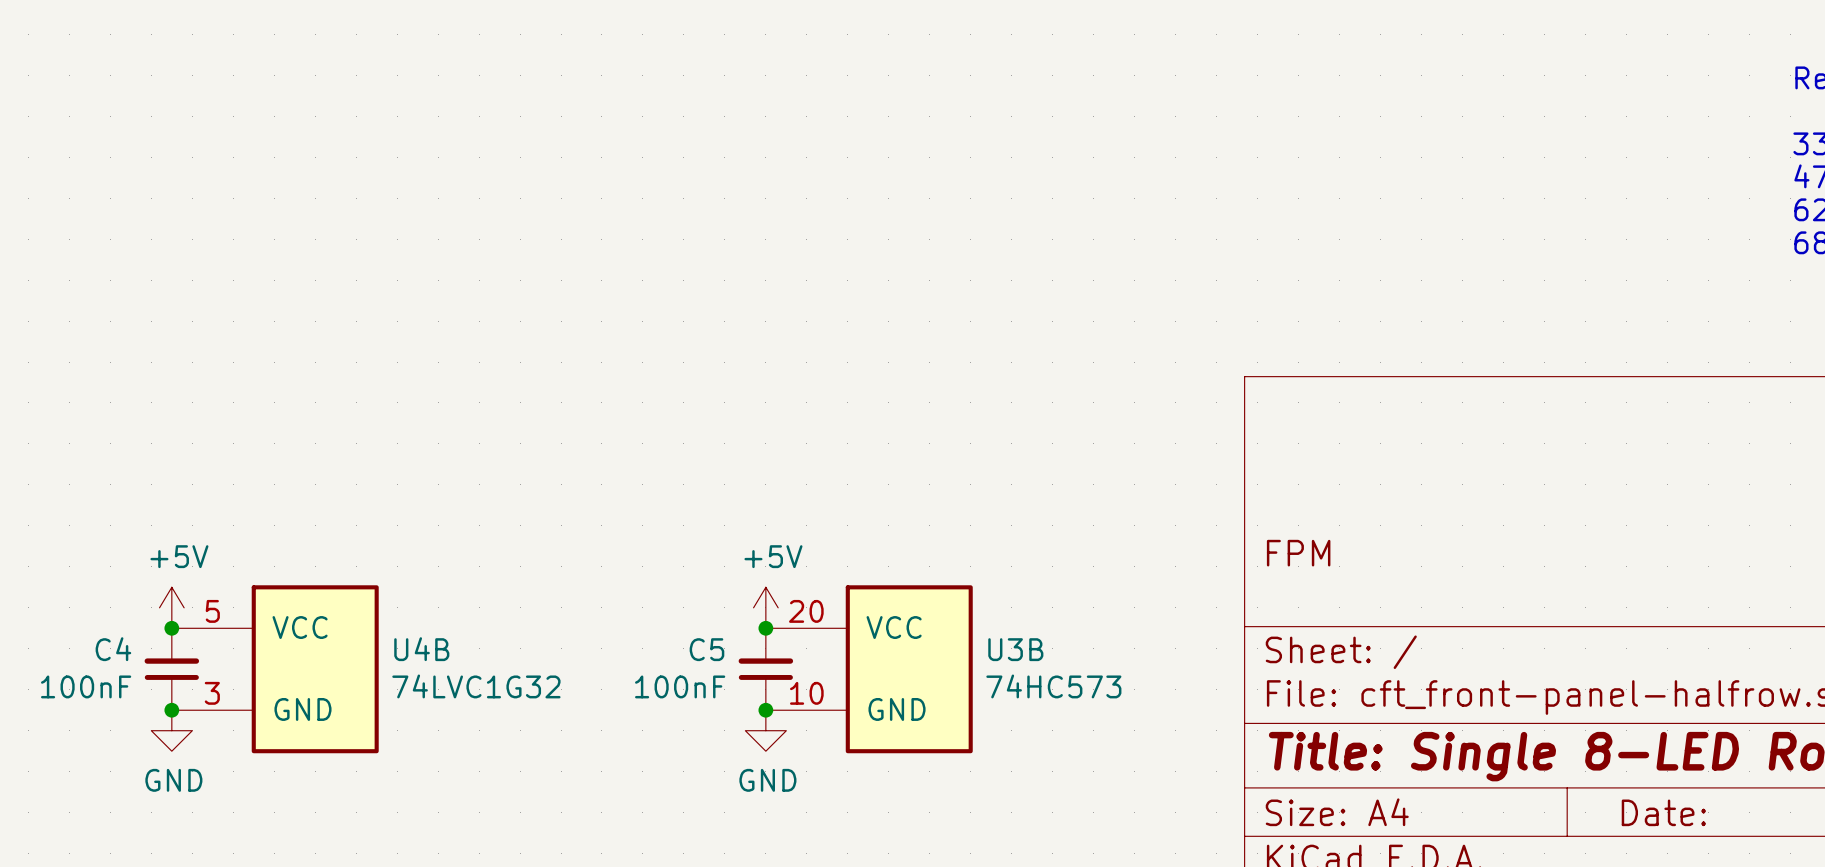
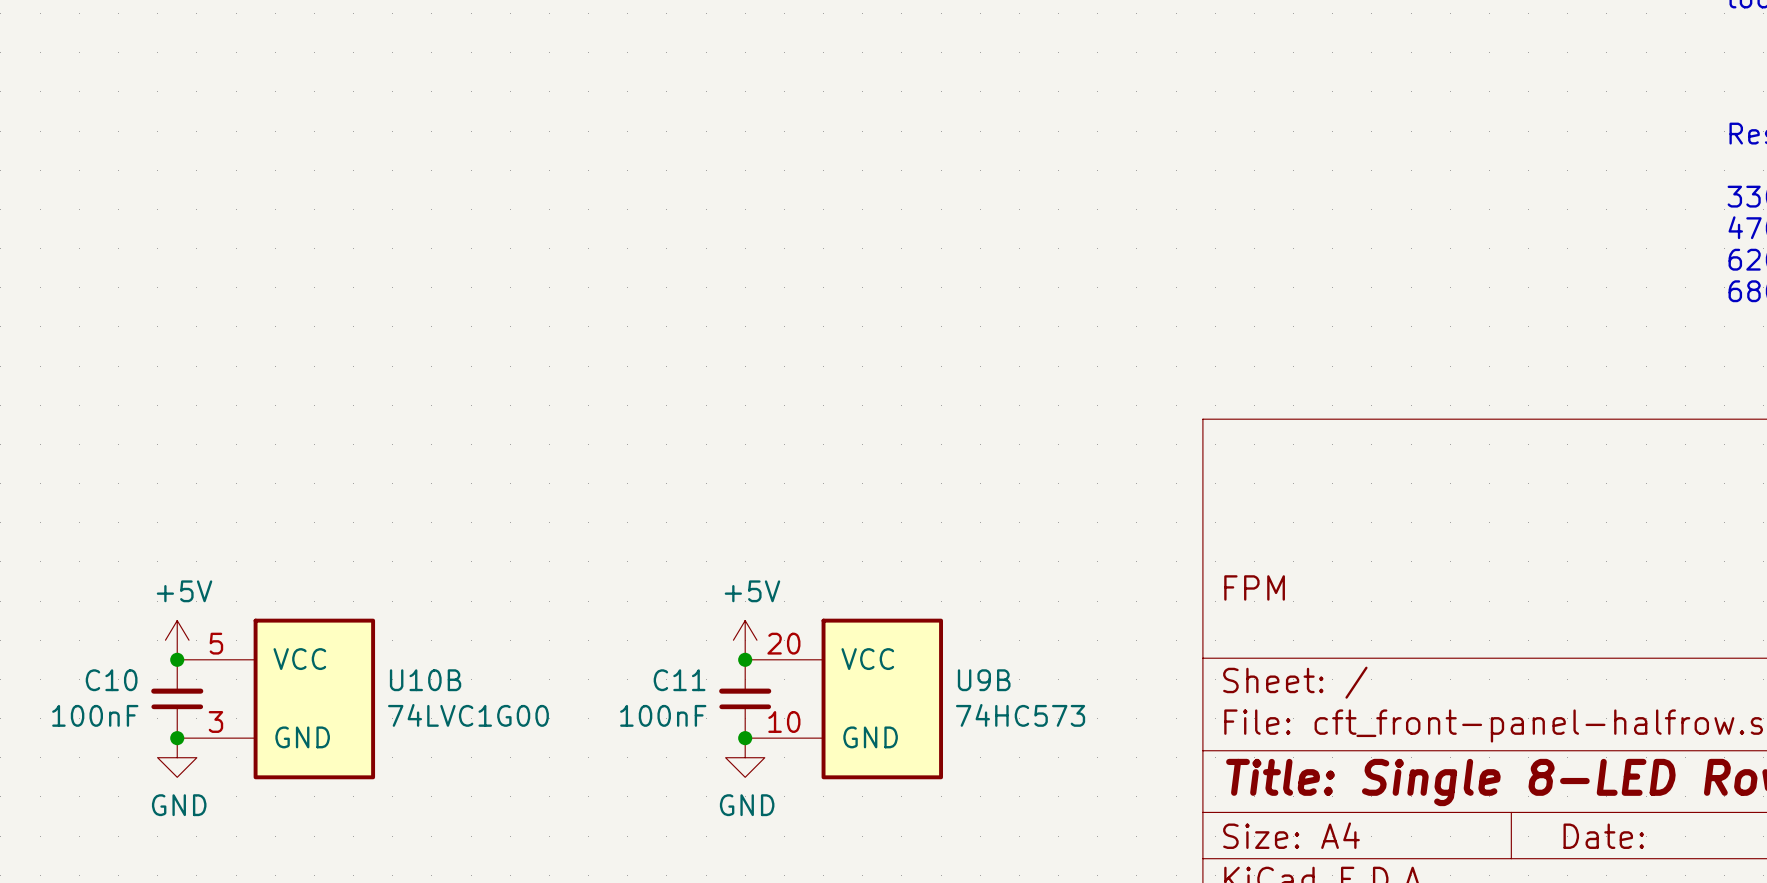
C4 name: C4 (113, 649) -> C10 (111, 680)
U4B name: U4B (421, 649) -> U10B (425, 680)
C5 name: C5 (706, 649) -> C11 (679, 680)
U3B name: U3B (1015, 649) -> U9B (984, 680)
U4B value: 74LVC1G32 (476, 686) -> 74LVC1G00 (468, 715)

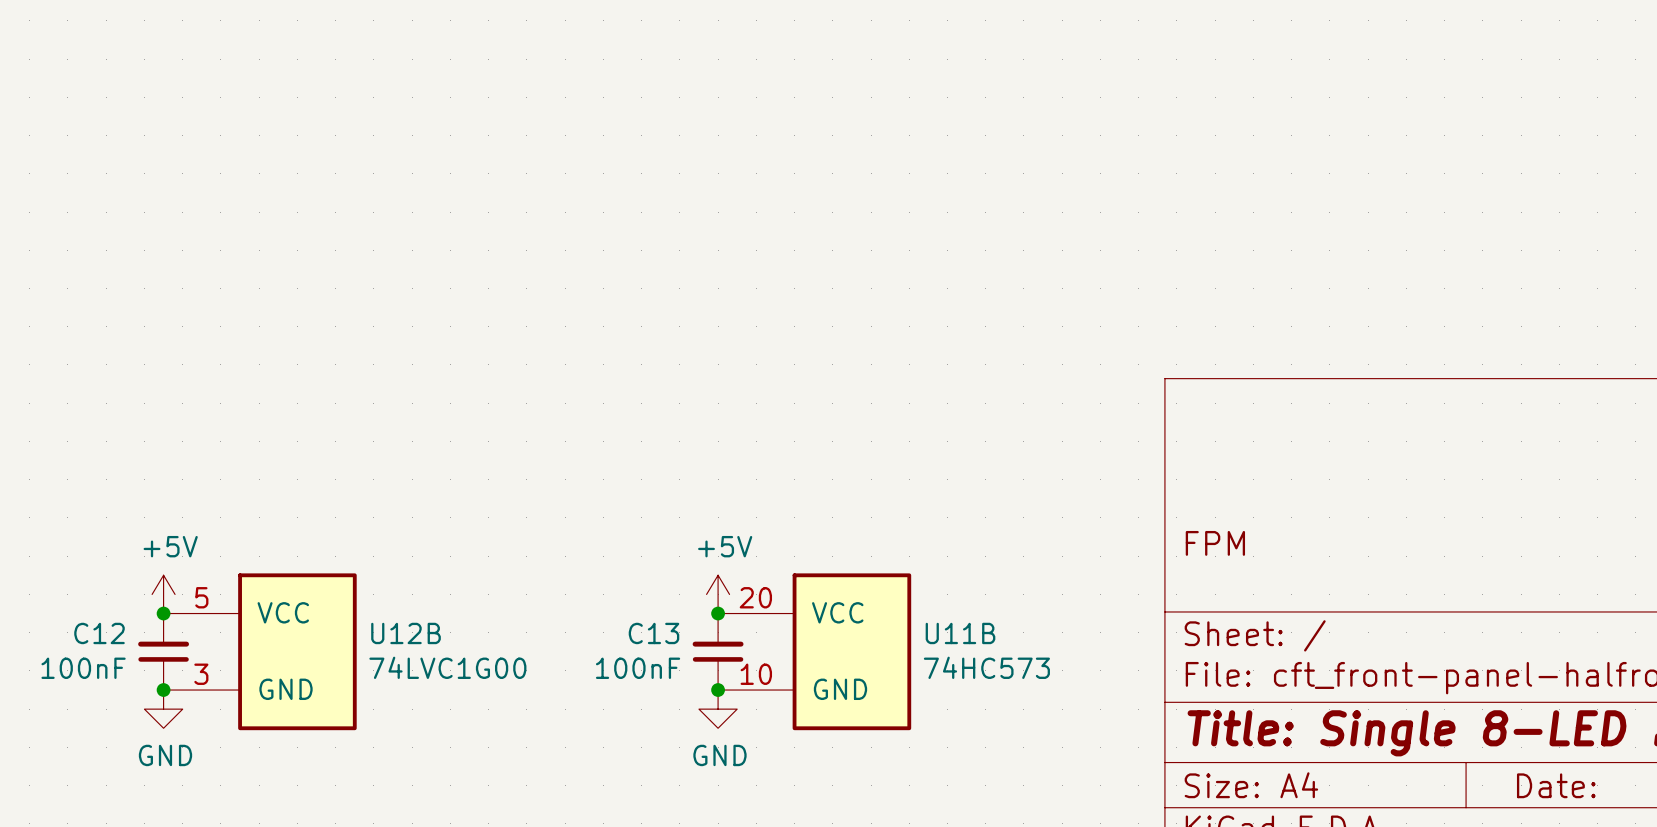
C10 name: C10 (111, 680) -> C12 (99, 633)
U10B name: U10B (425, 680) -> U12B (406, 633)
C11 name: C11 (679, 680) -> C13 (653, 633)
U9B name: U9B (984, 680) -> U11B (960, 633)

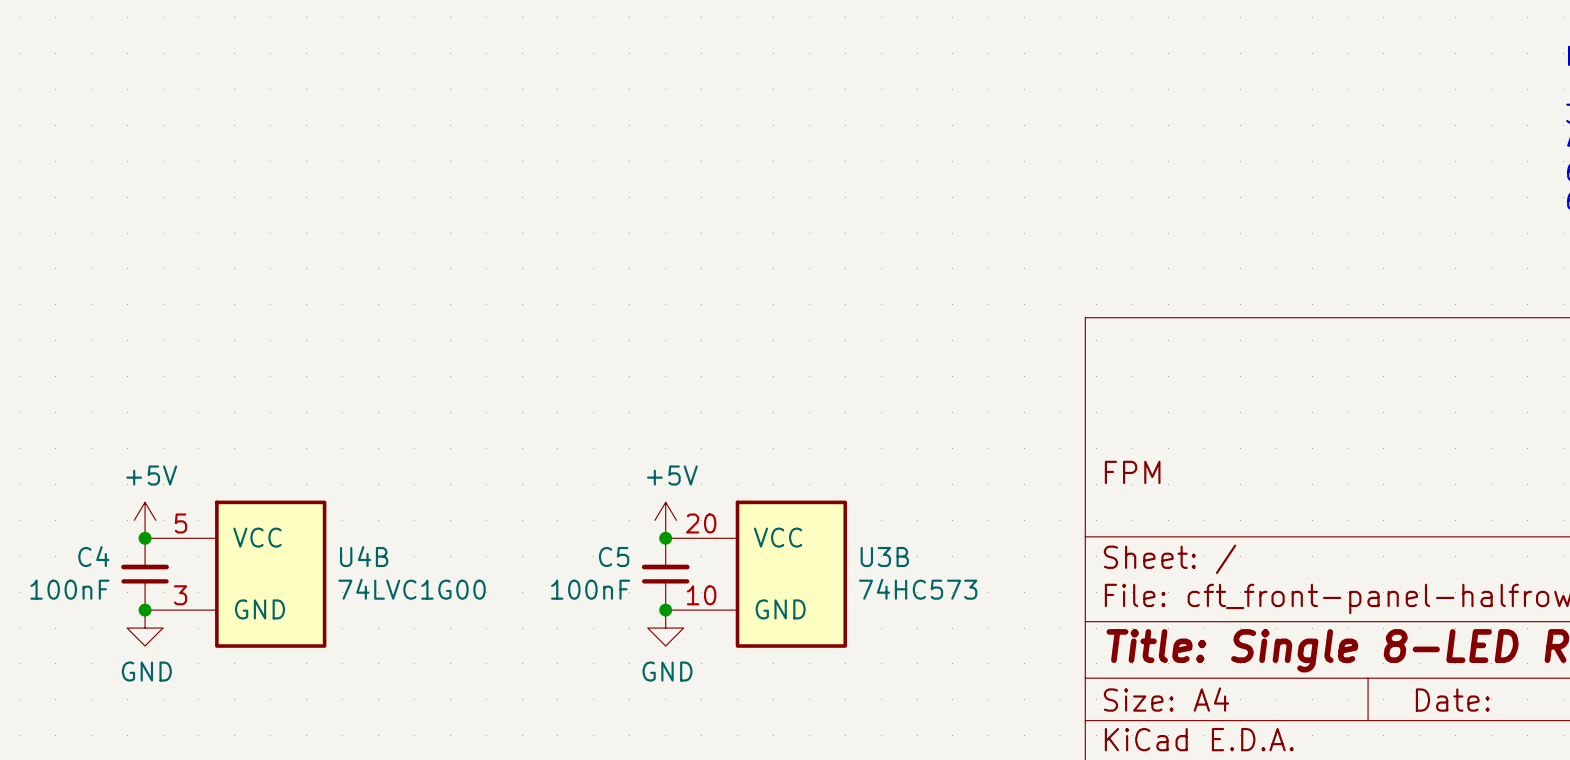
C12 name: C12 (99, 633) -> C4 (93, 556)
U12B name: U12B (406, 633) -> U4B (364, 556)
C13 name: C13 (653, 633) -> C5 (614, 557)
U11B name: U11B (960, 633) -> U3B (884, 557)

